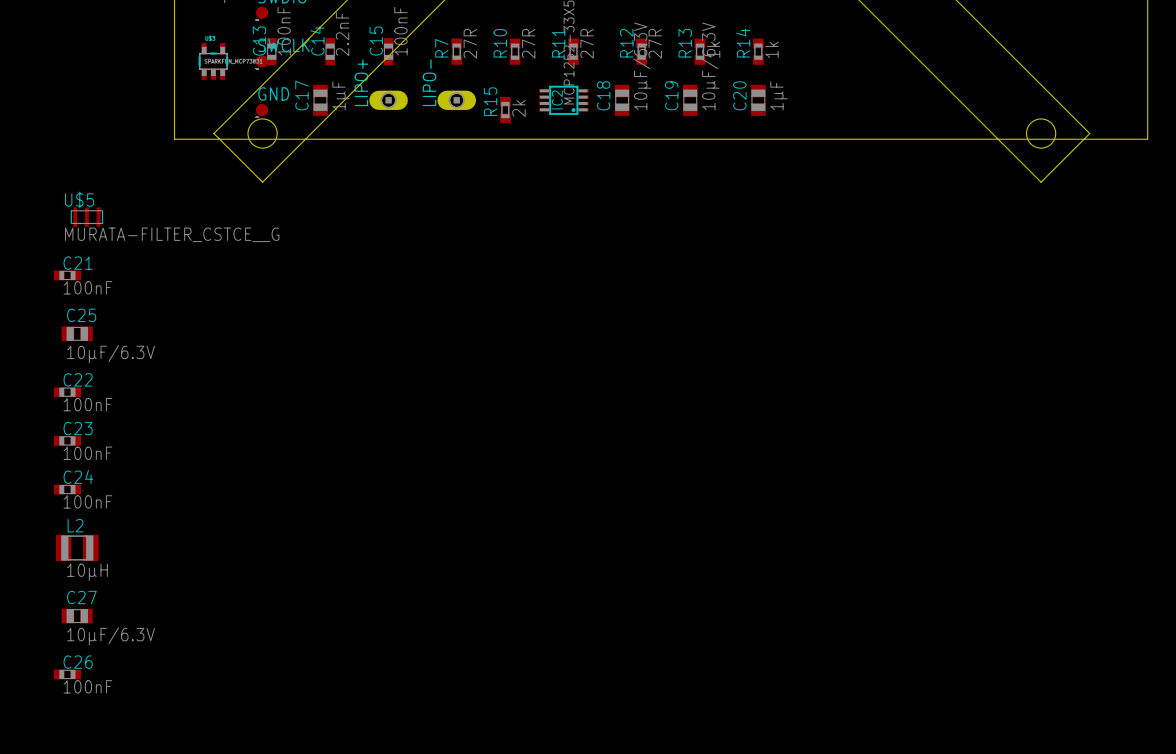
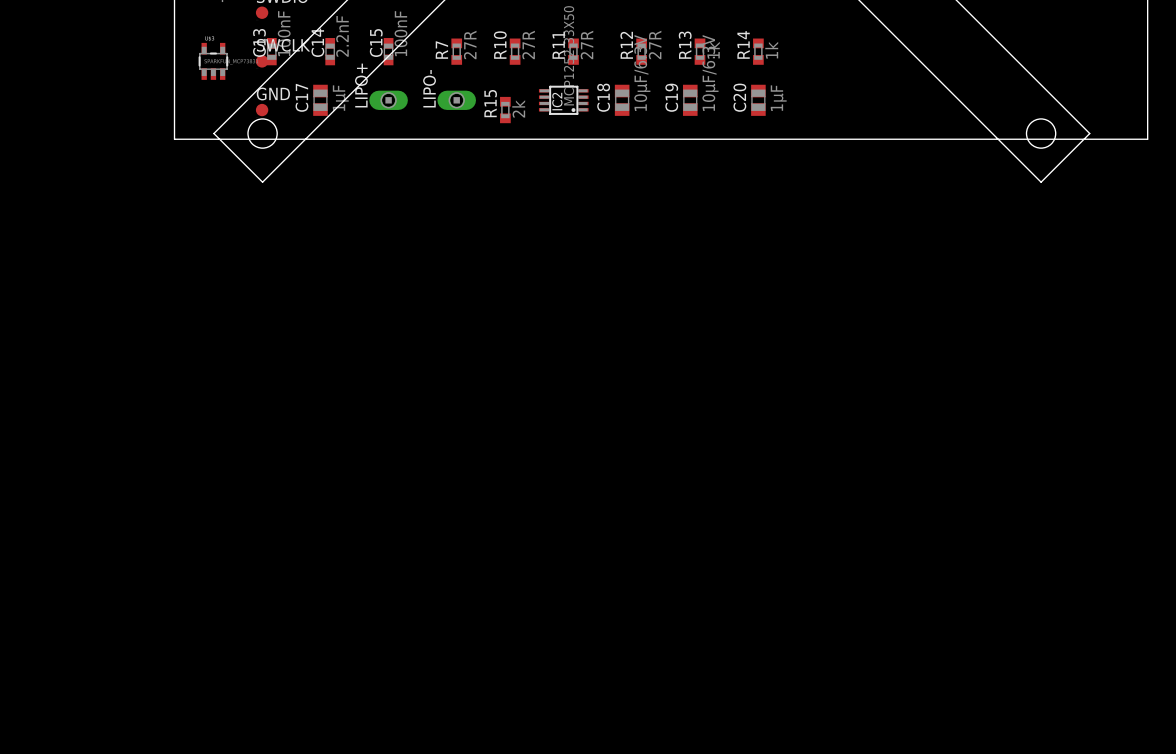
U$5: MURATA-FILTER_CSTCE__G (86, 217) -> none
C21: 100nF (67, 275) -> none
C25: 10µF/6.3V (77, 333) -> none
C22: 100nF (67, 392) -> none
C23: 100nF (67, 440) -> none
C24: 100nF (67, 489) -> none
L2: 10µH (77, 547) -> none
C27: 10µF/6.3V (77, 616) -> none
C26: 100nF (67, 674) -> none

